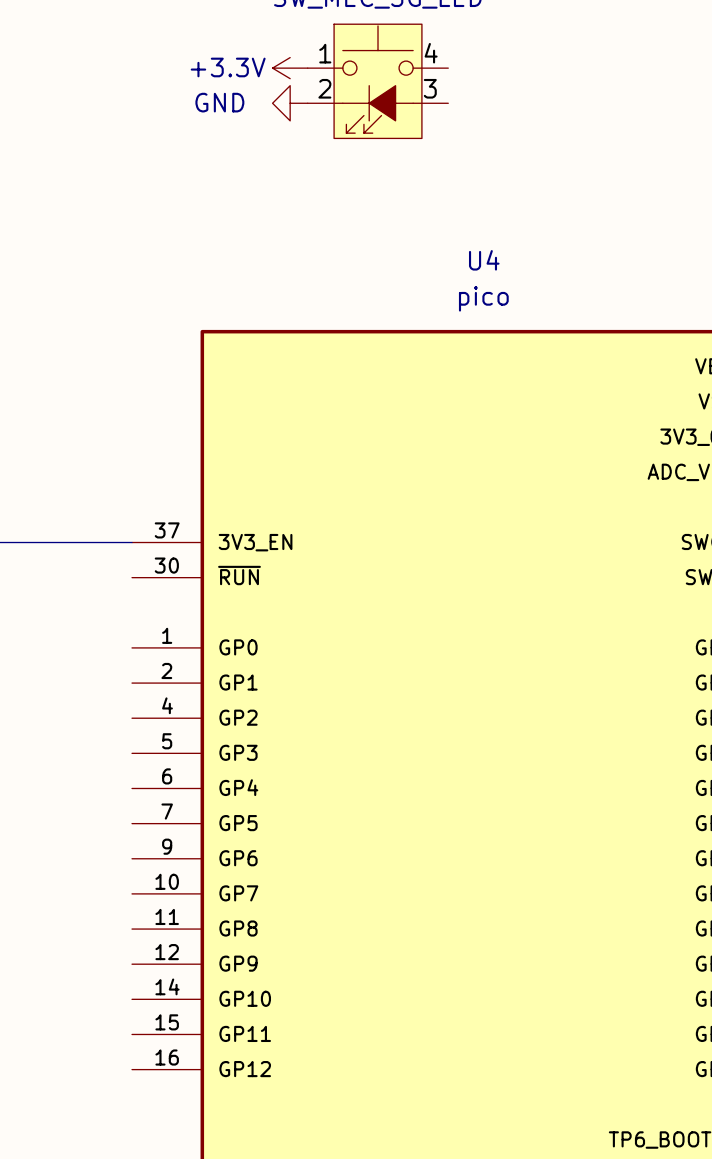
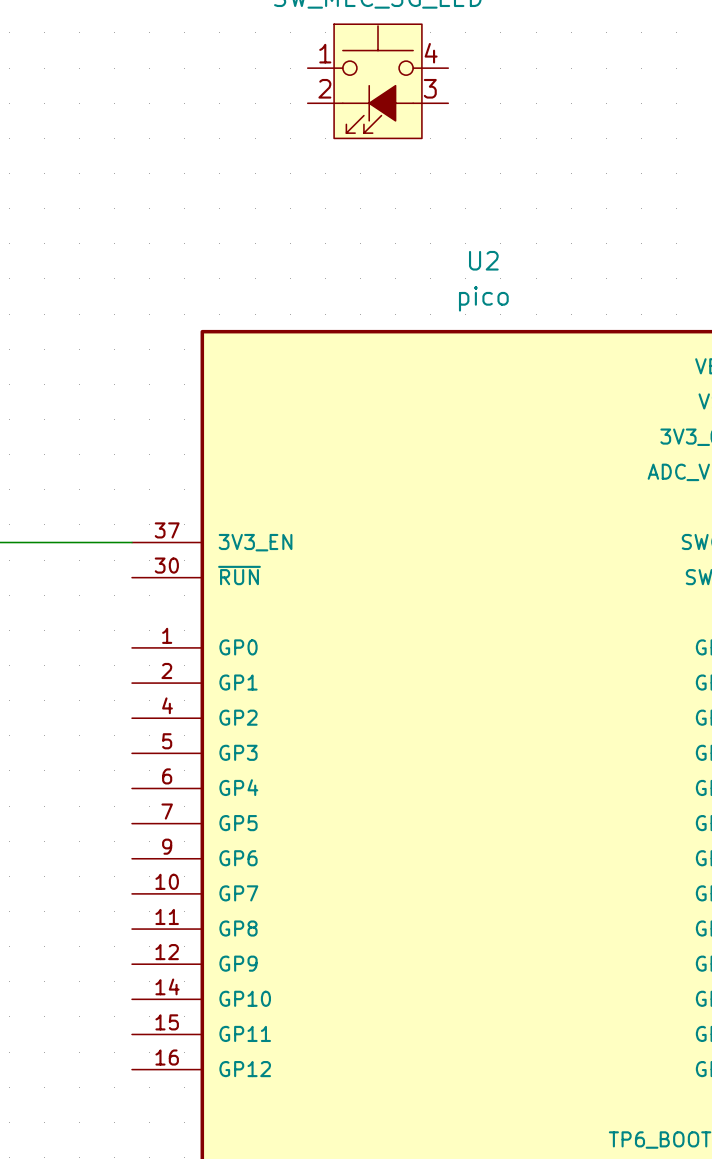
power symbol: +3.3V (290, 68) -> none
power symbol: GND (290, 103) -> none
U4 name: U4 (484, 260) -> U2 (483, 260)

